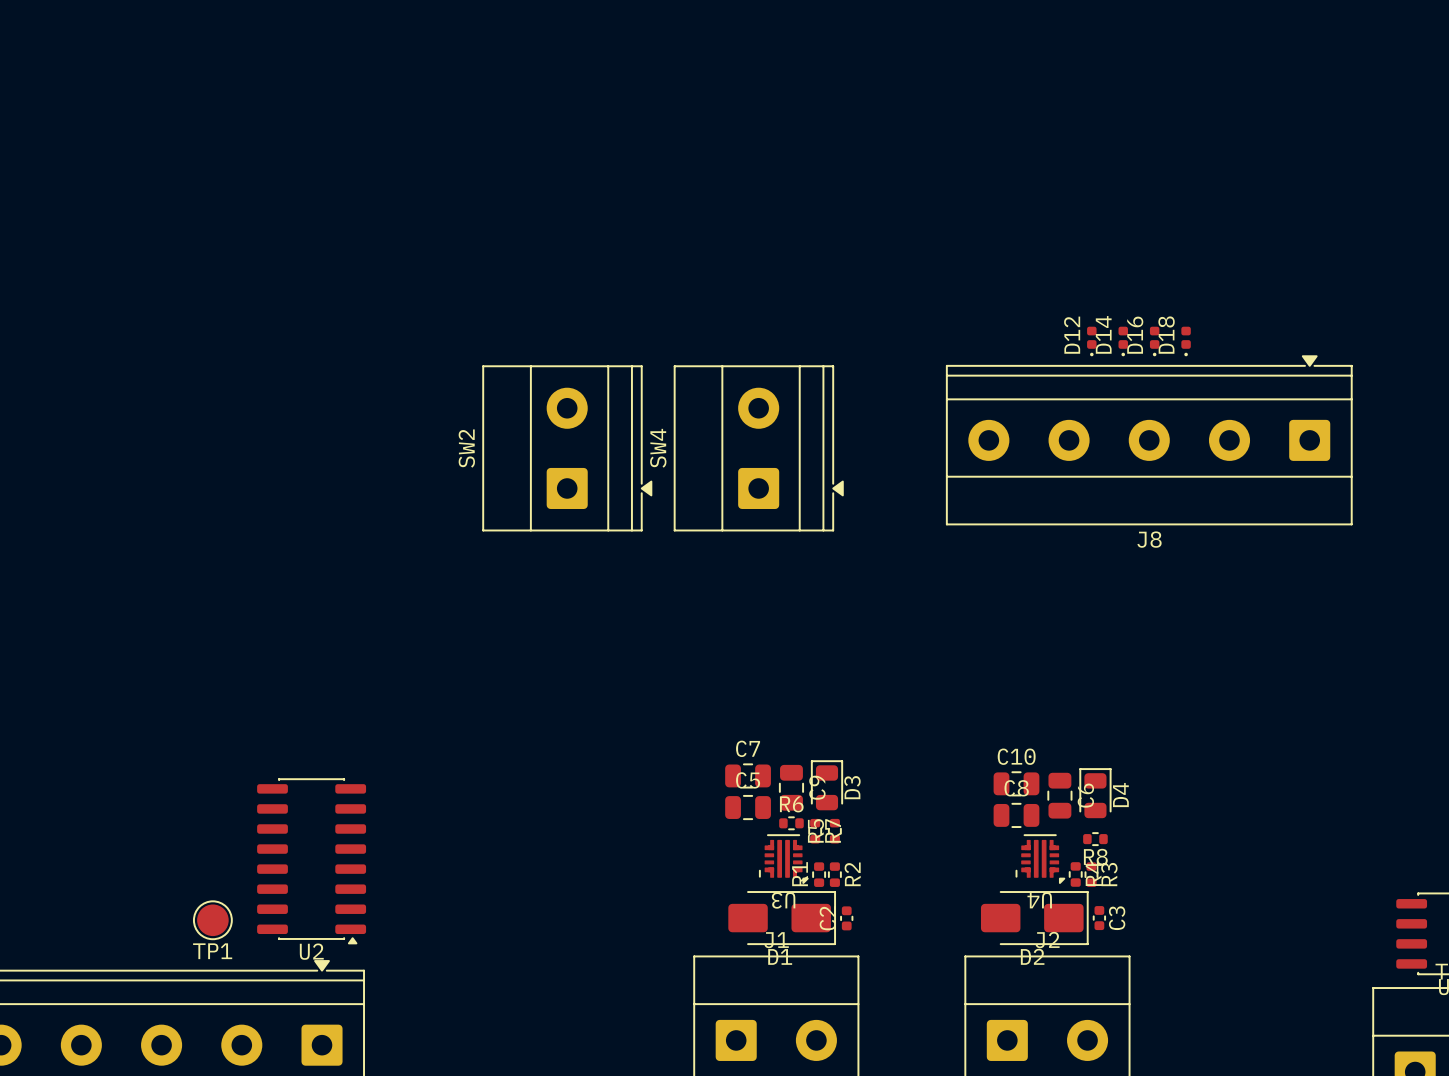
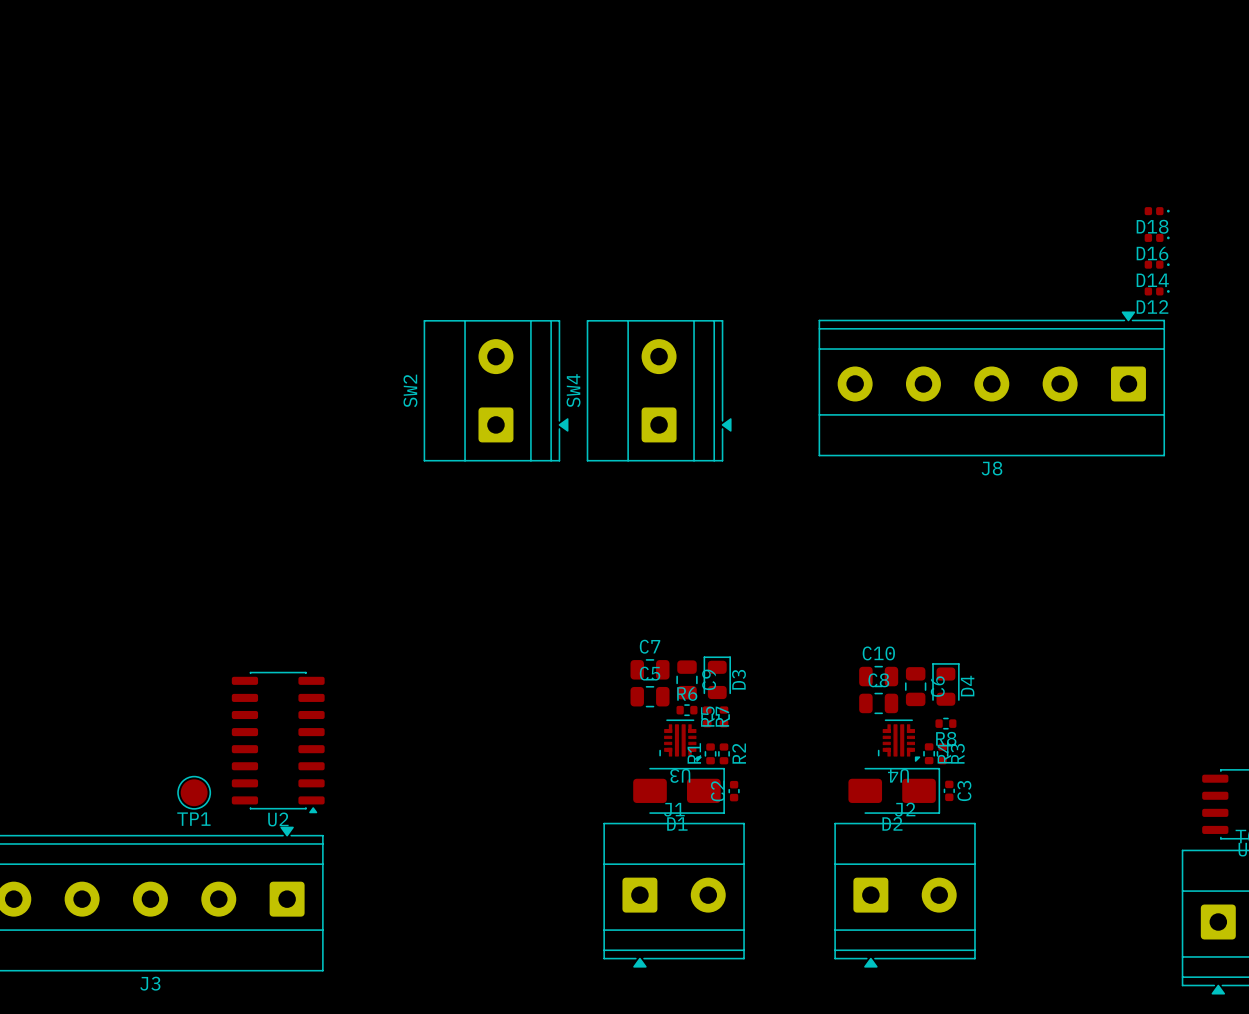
D12 rotation: 0° (1091, 341) -> 90° counterclockwise (1157, 291)
D12 position: (1091, 341) -> (1157, 291)
D14 rotation: 0° (1123, 341) -> 90° counterclockwise (1157, 264)
D14 position: (1123, 341) -> (1157, 264)
D16 rotation: 0° (1154, 341) -> 90° counterclockwise (1157, 237)
D16 position: (1154, 341) -> (1157, 237)
D18 rotation: 0° (1186, 341) -> 90° counterclockwise (1157, 211)
D18 position: (1186, 341) -> (1157, 211)

